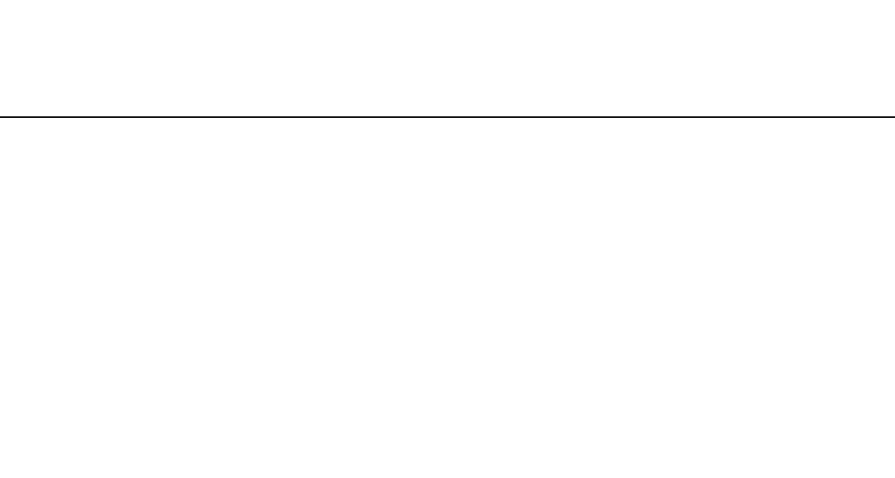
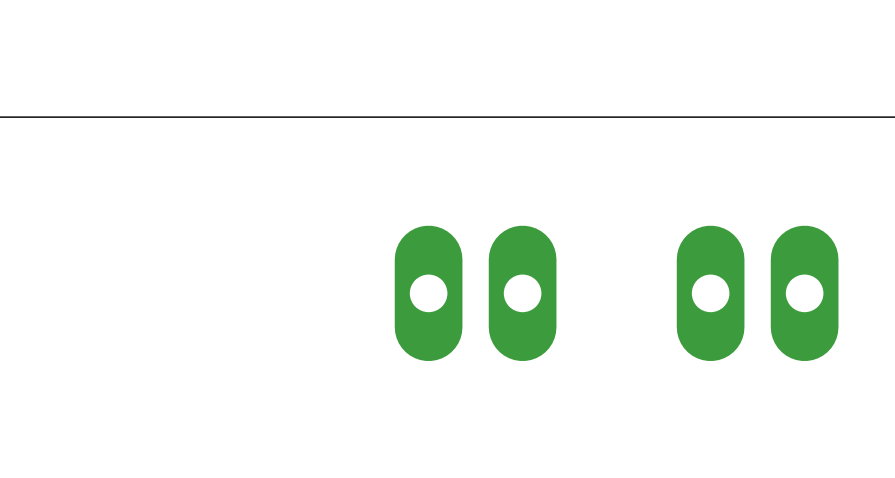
part: none -> (475, 293)
part: none -> (757, 293)

